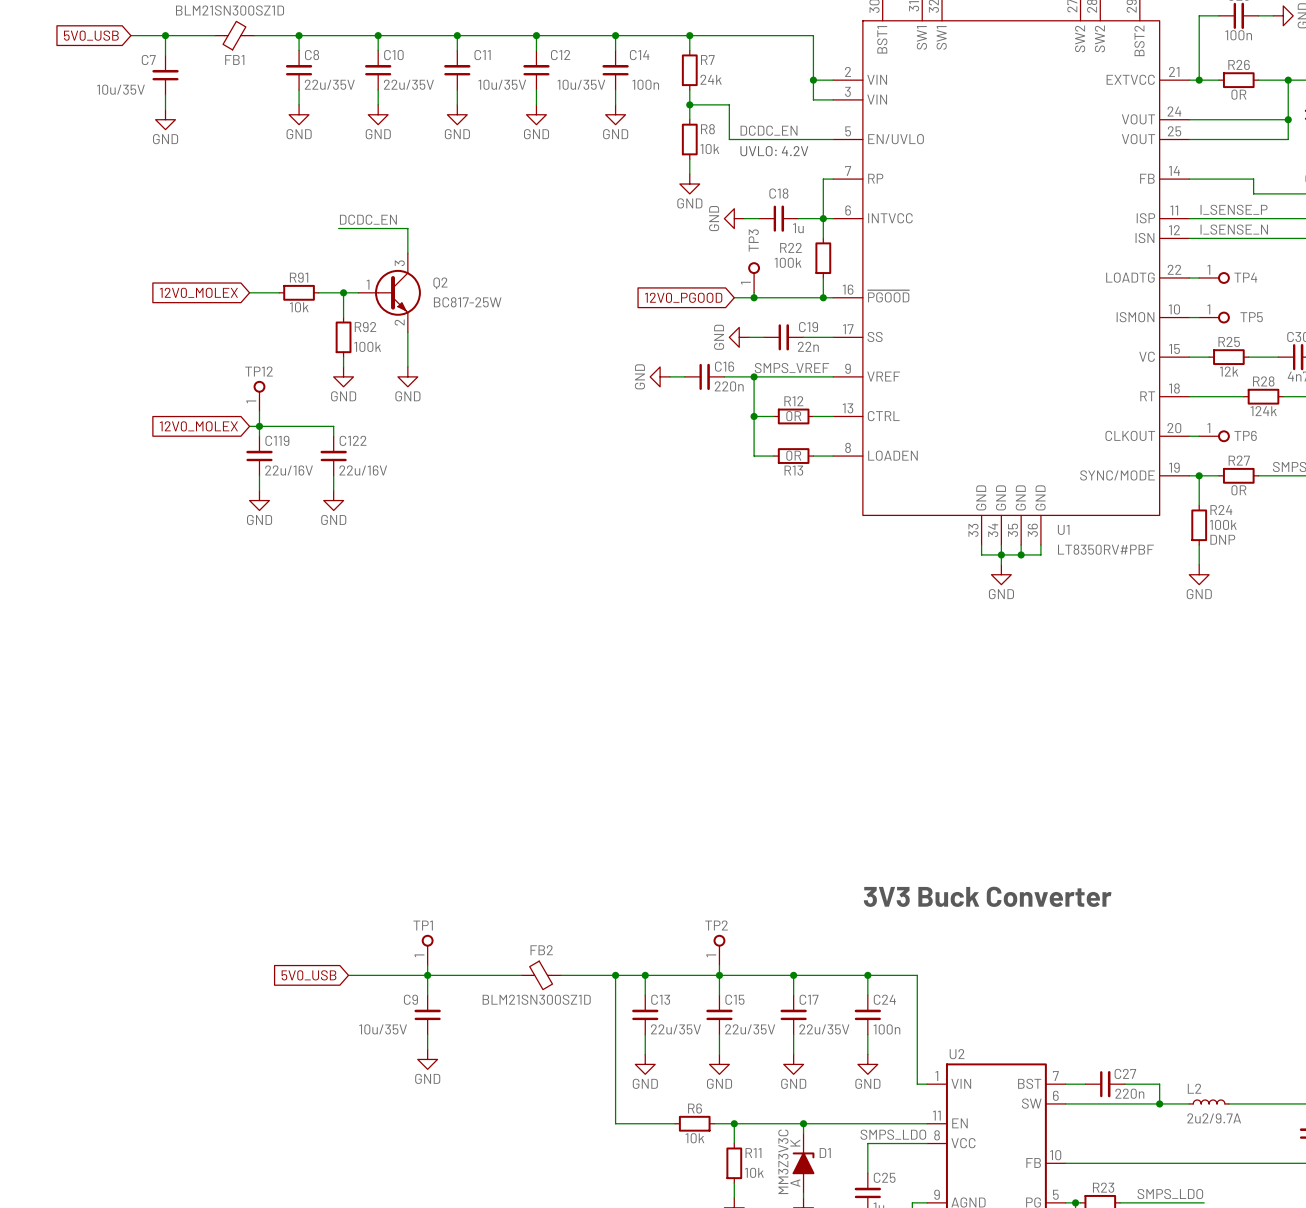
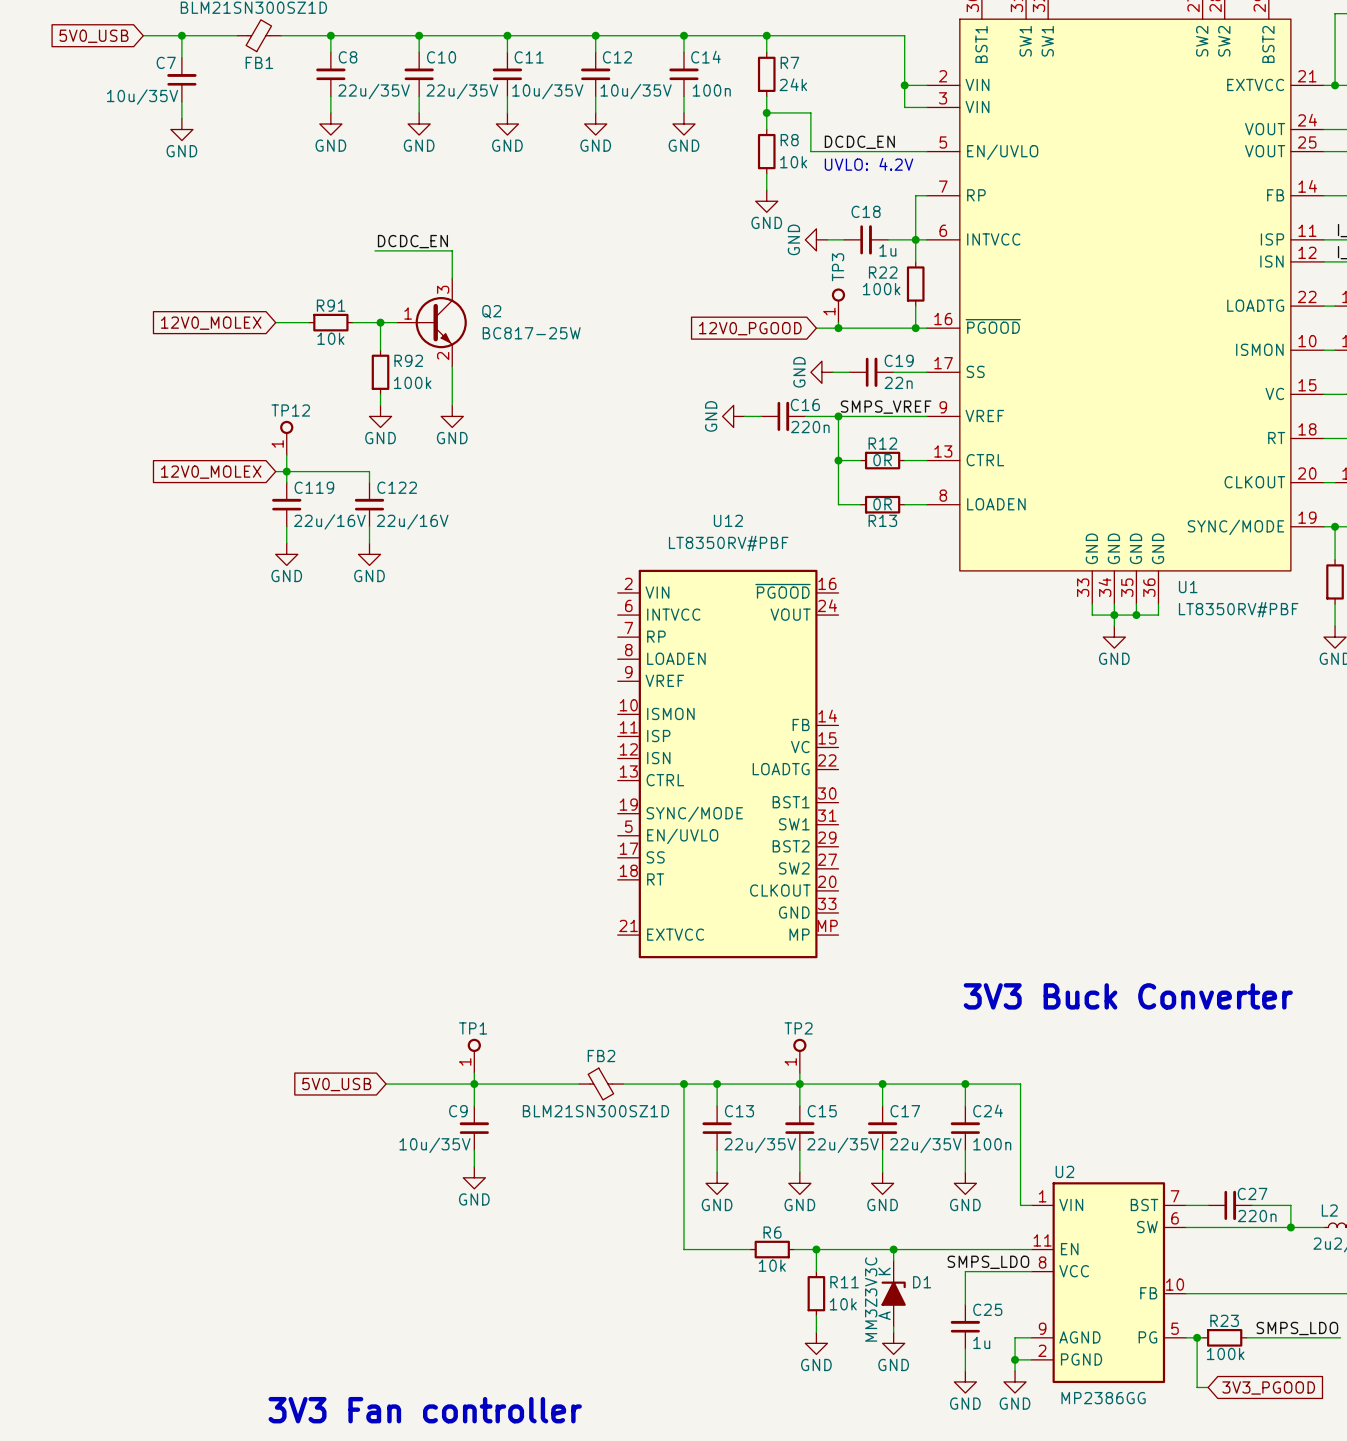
U12: none -> (728, 764)

